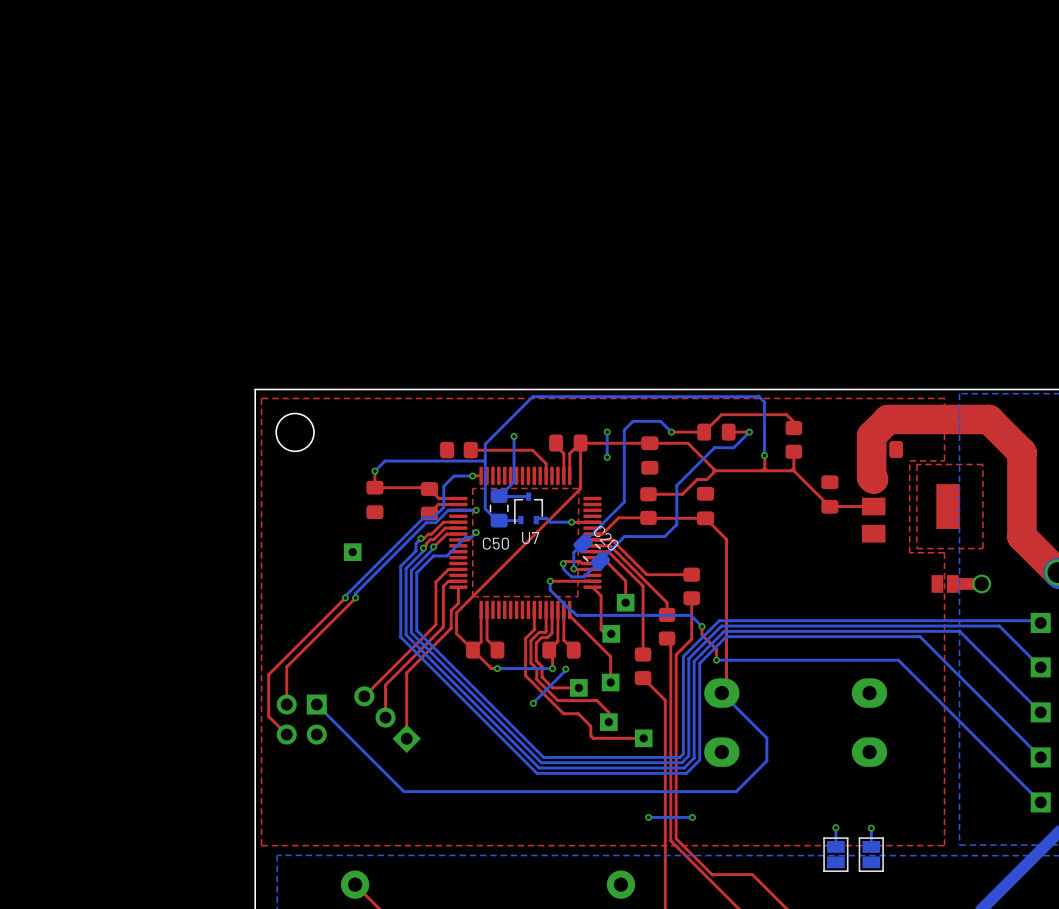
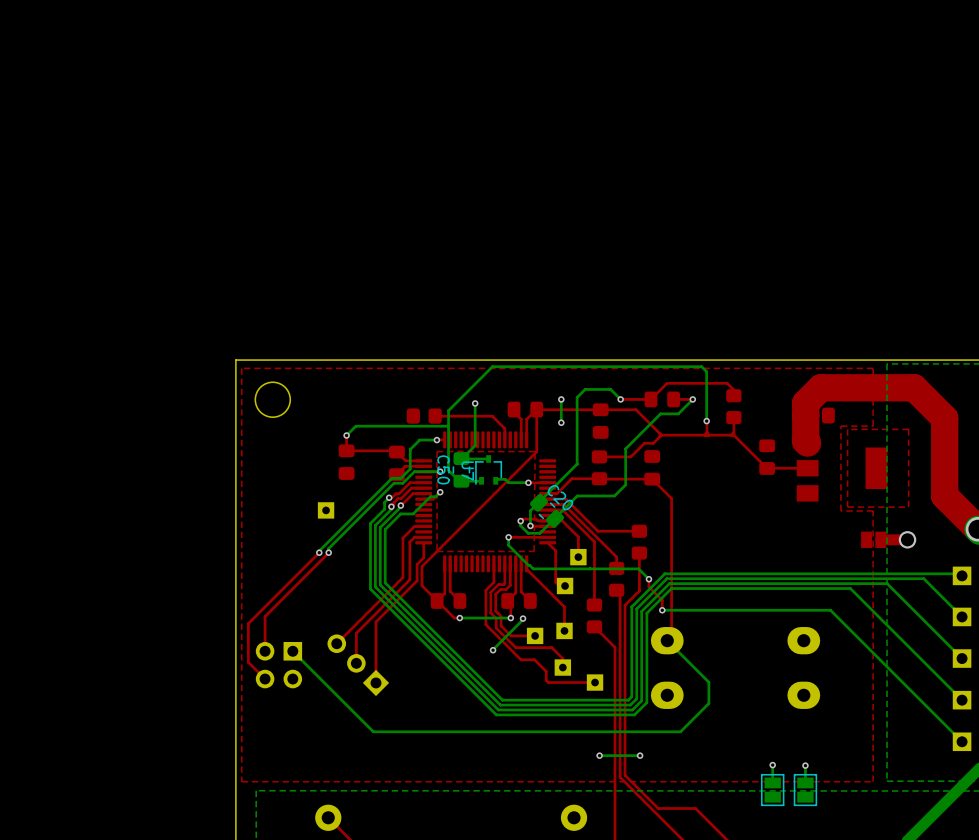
U7 name rotation: 0° (530, 537) -> 90° clockwise (467, 470)
U7 name position: U7 (530, 537) -> U7 (467, 470)
C50 name rotation: 0° (495, 543) -> 90° clockwise (443, 469)

